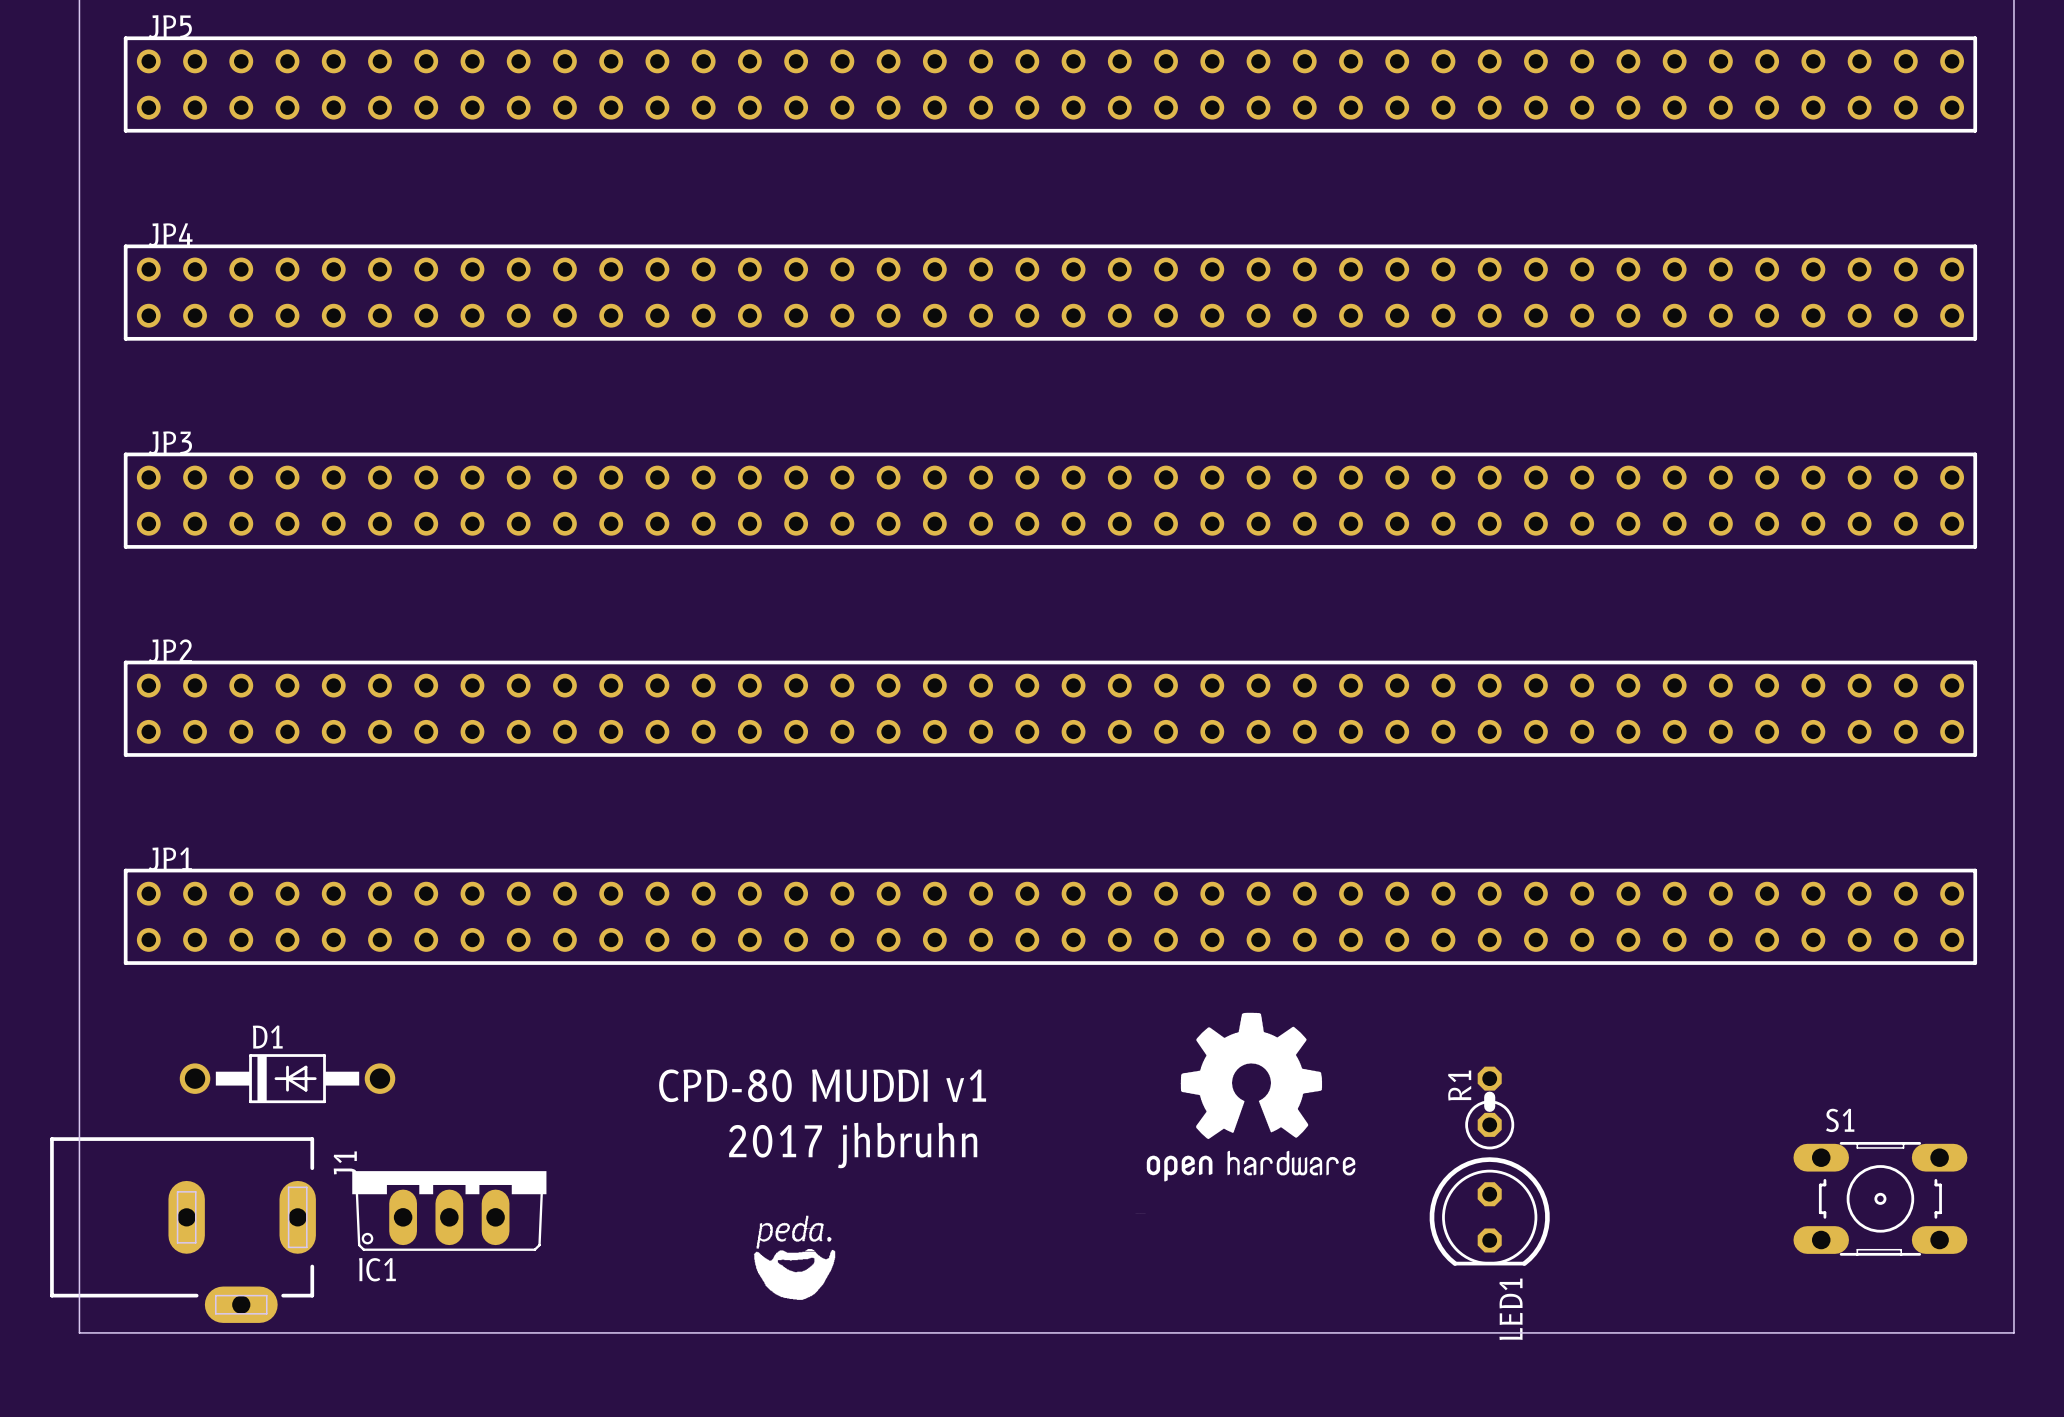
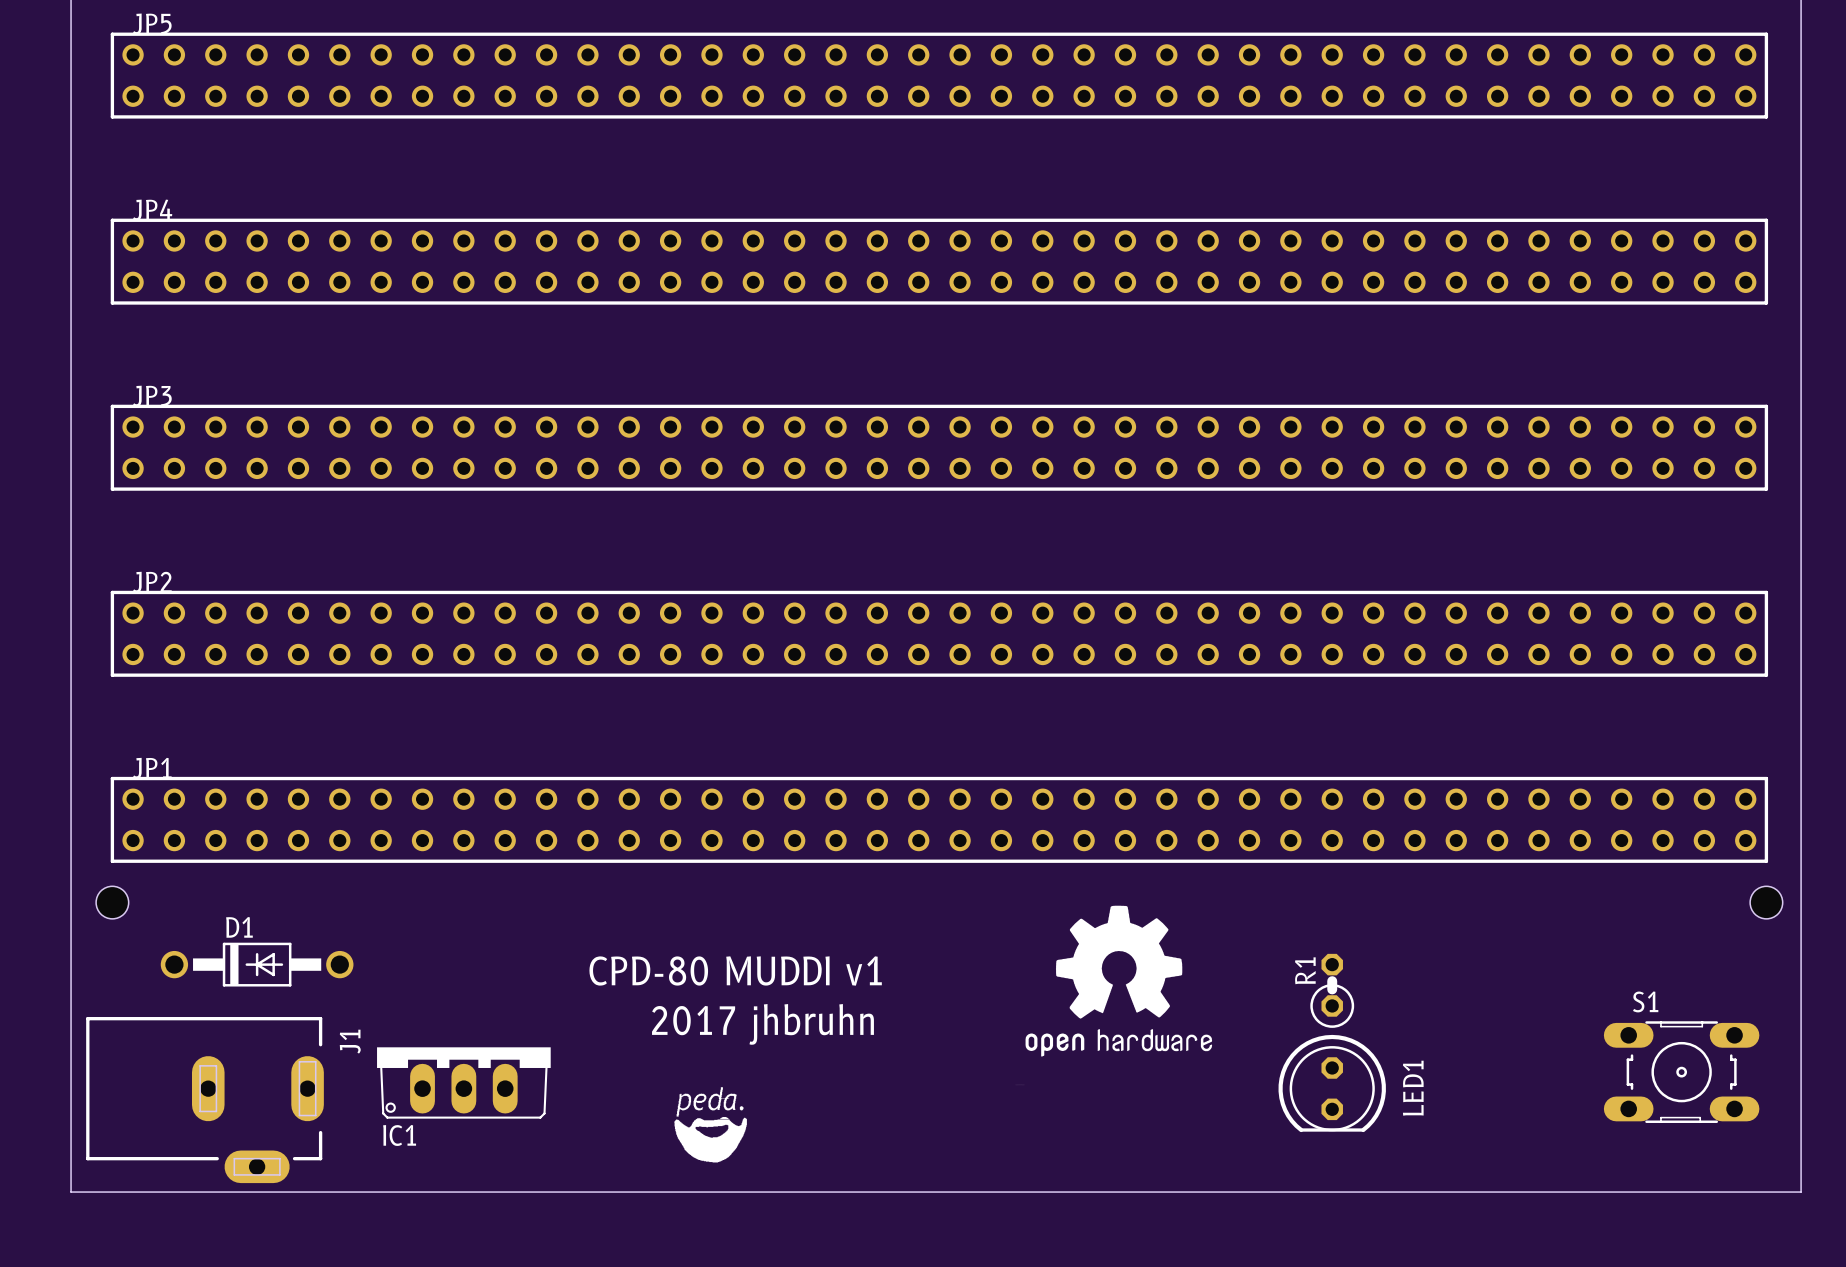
hole: none -> (112, 902)
hole: none -> (1766, 902)
IC1 position: (449, 1210) -> (463, 1082)
J1 position: (183, 1230) -> (205, 1100)
LED1 name position: LED1 (1510, 1309) -> LED1 (1413, 1088)

